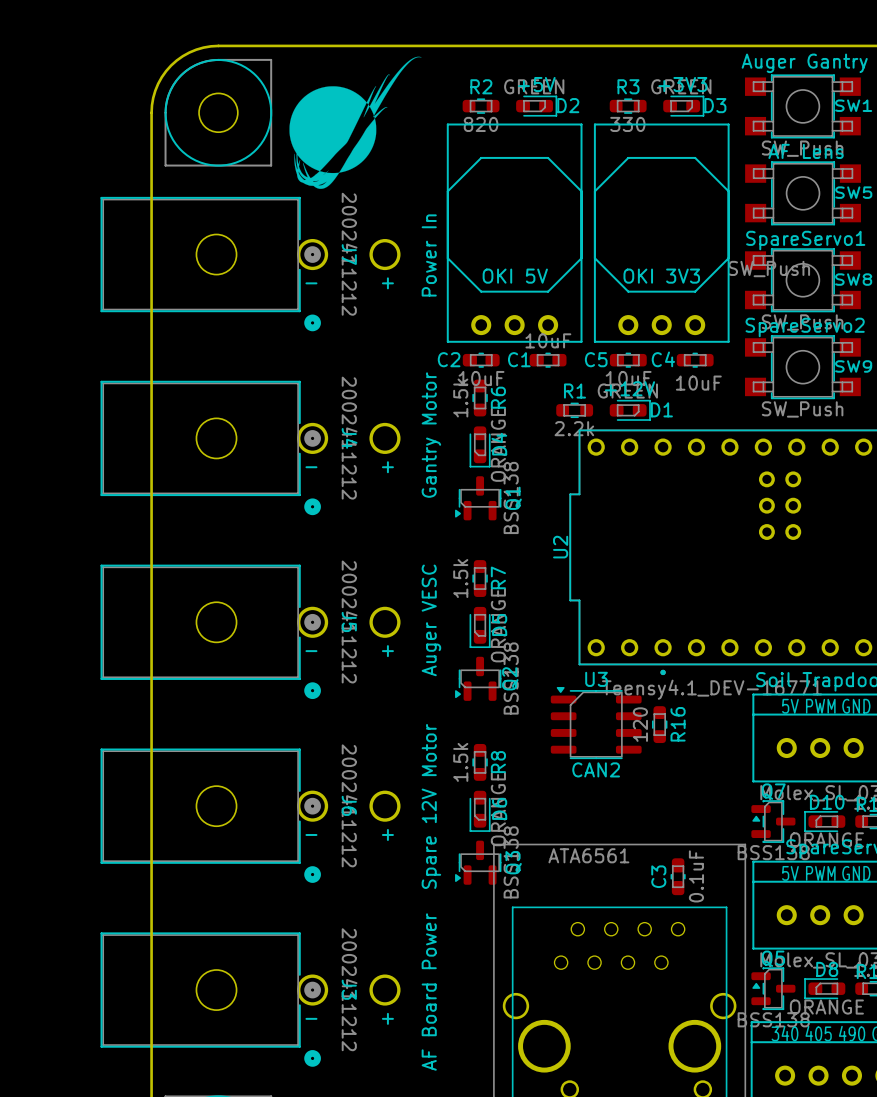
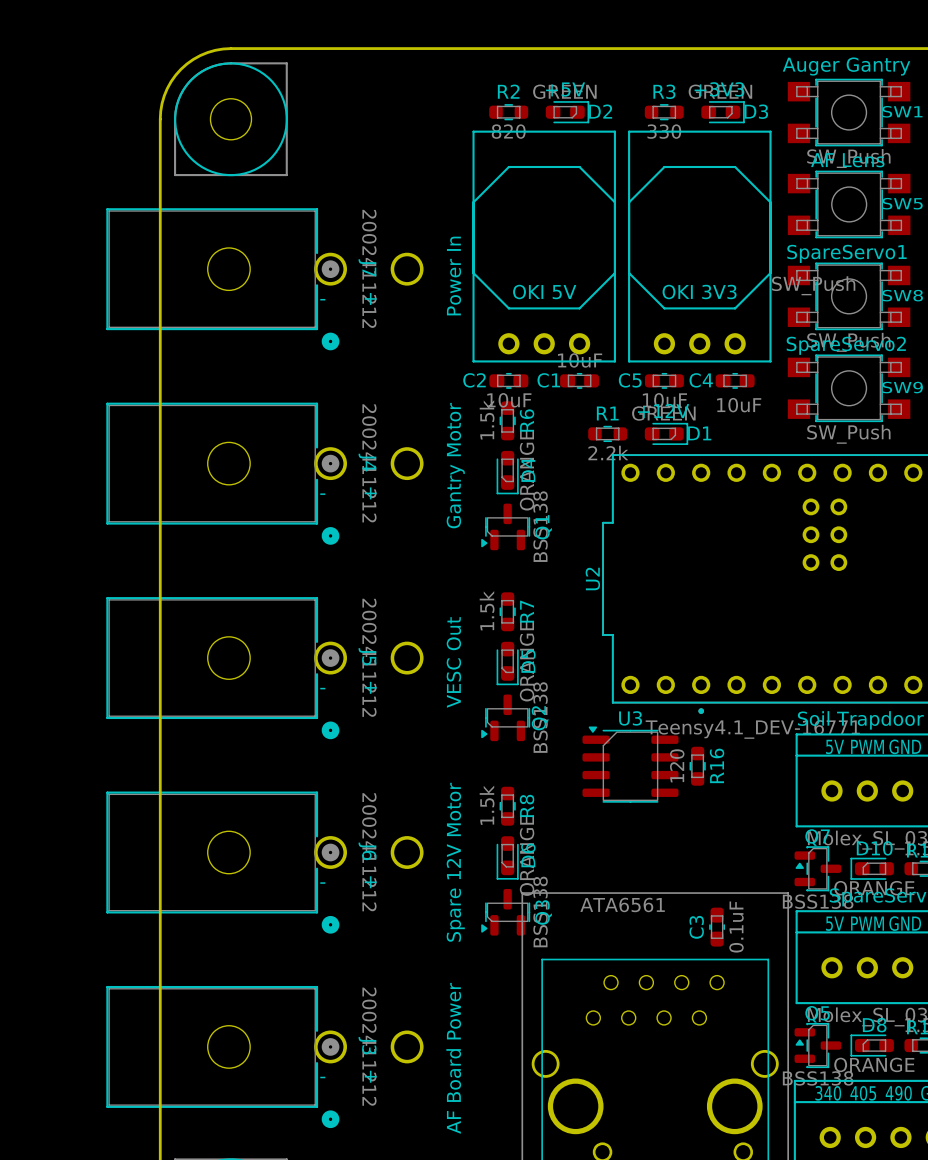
drawing: [289, 56, 422, 189] -> none
text: Auger VESC (431, 620) -> VESC Out (453, 662)
text: CAN2 (596, 769) -> none

